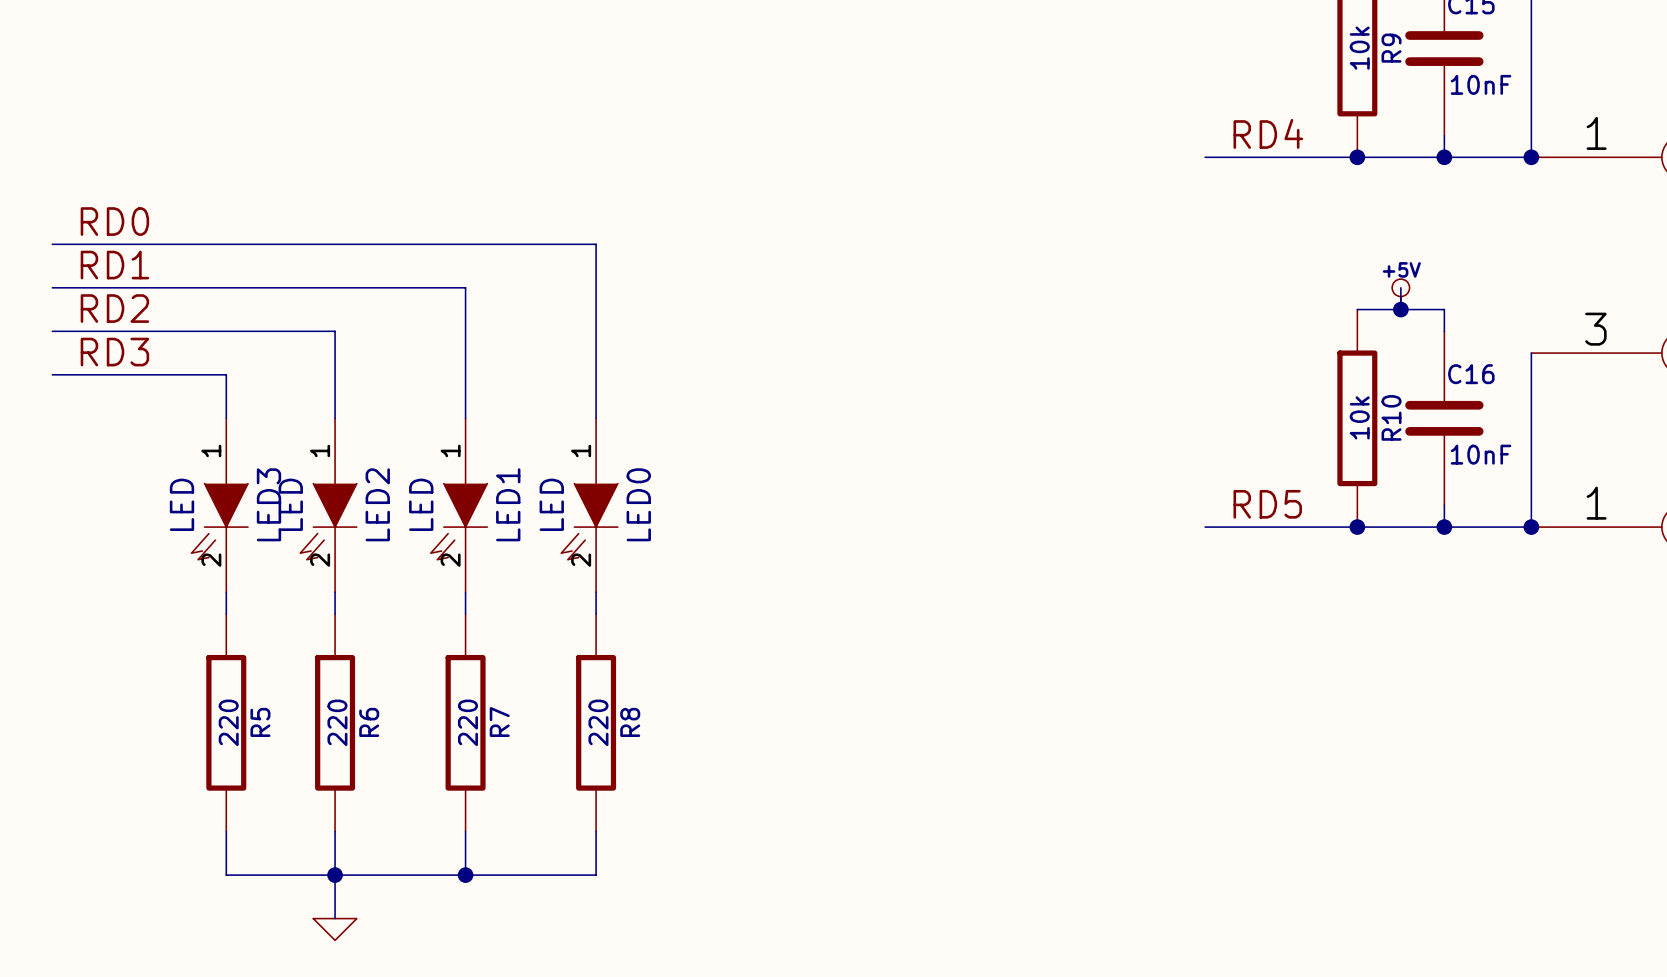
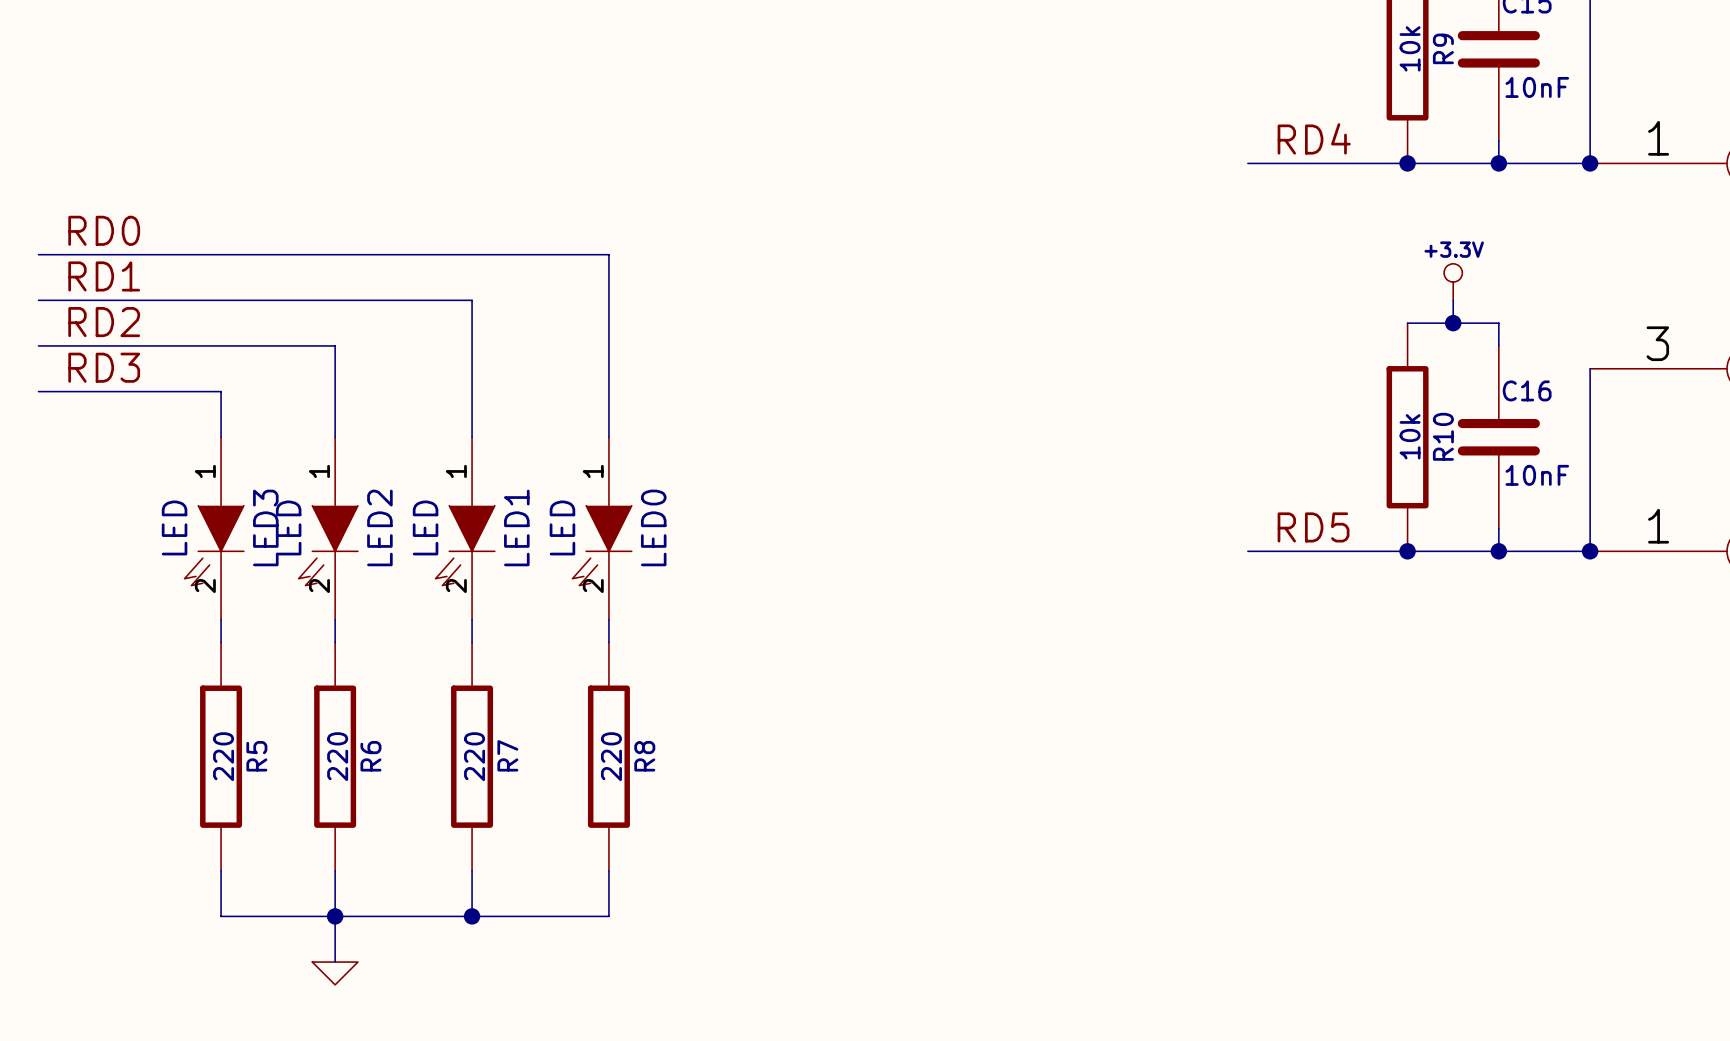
power symbol: none -> +3.3V (1453, 282)
power symbol: +5V (1400, 294) -> none

